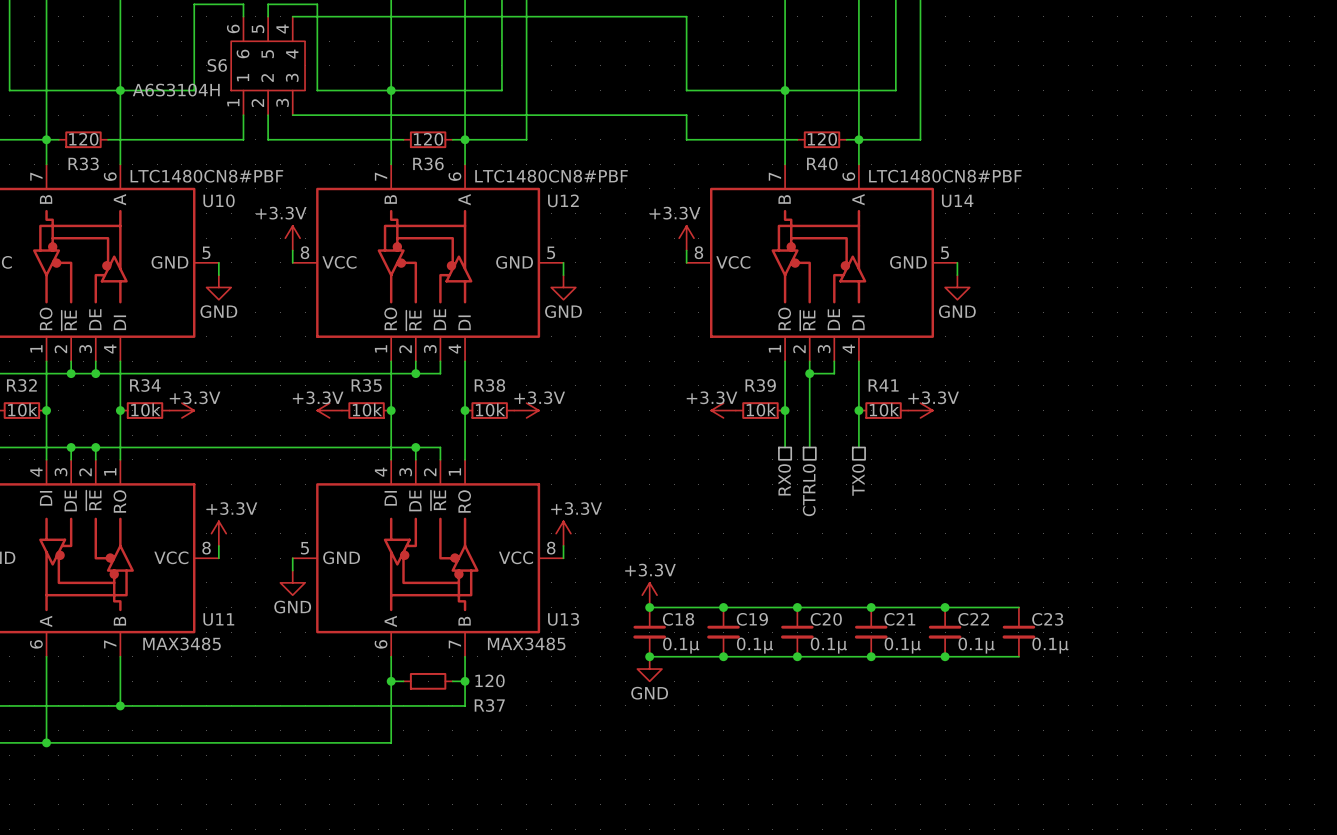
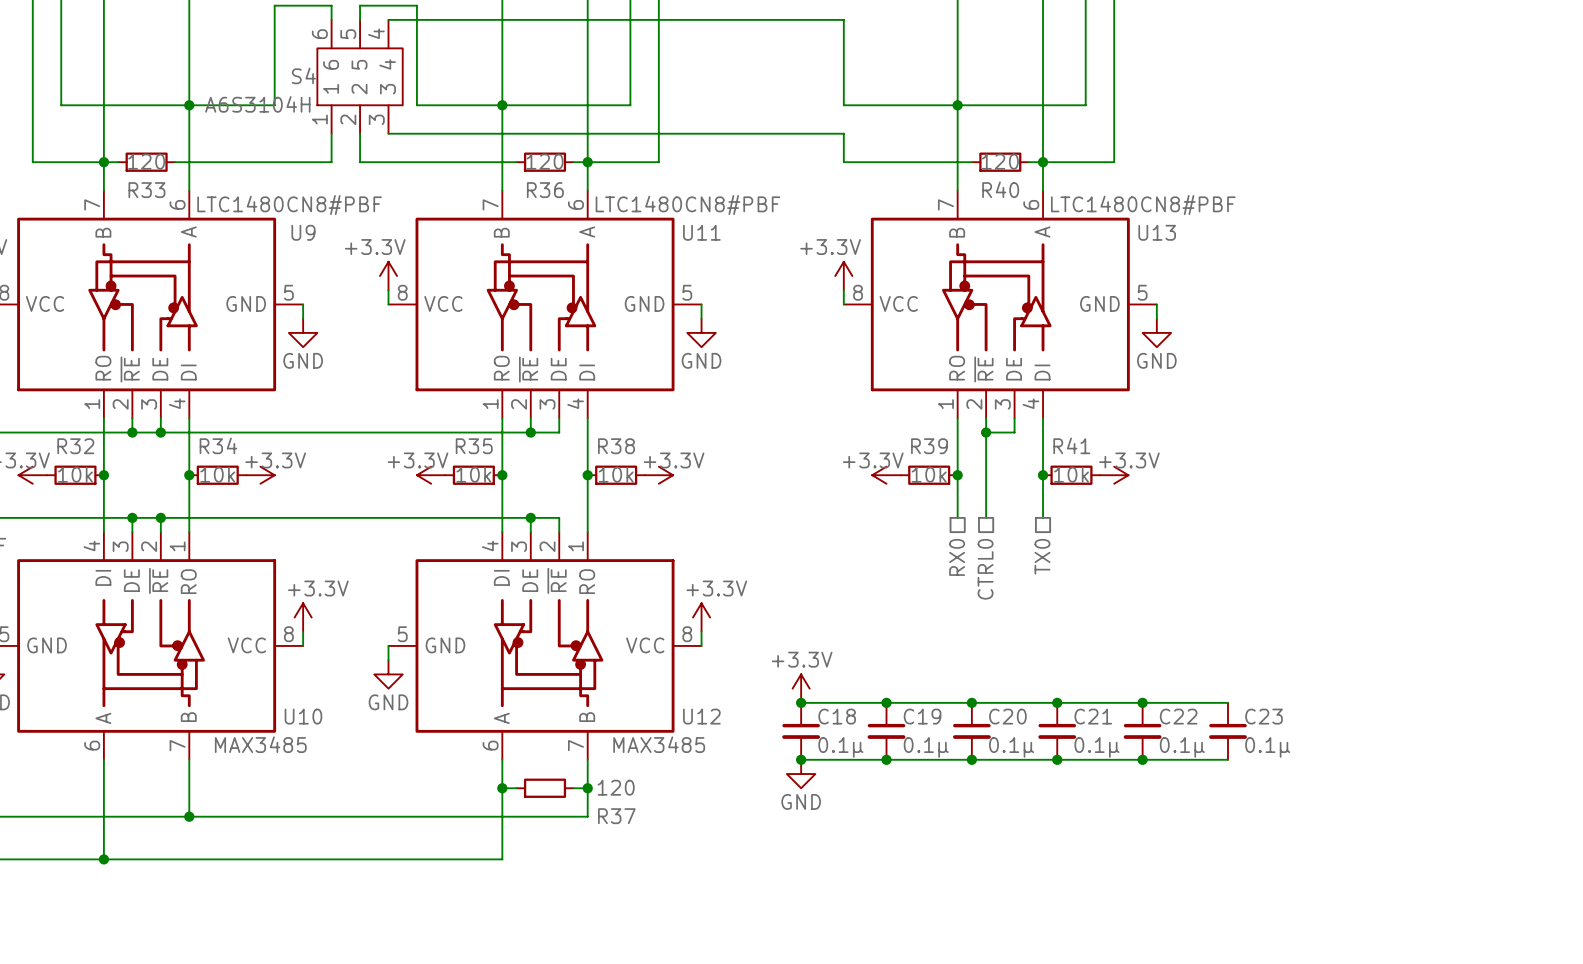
S6 name: S6 (217, 65) -> S4 (303, 75)
U10 name: U10 (219, 200) -> U9 (303, 232)
U12 name: U12 (563, 200) -> U11 (701, 232)
U14 name: U14 (957, 200) -> U13 (1157, 232)
U11 name: U11 (218, 619) -> U10 (303, 716)
U13 name: U13 (563, 619) -> U12 (701, 716)

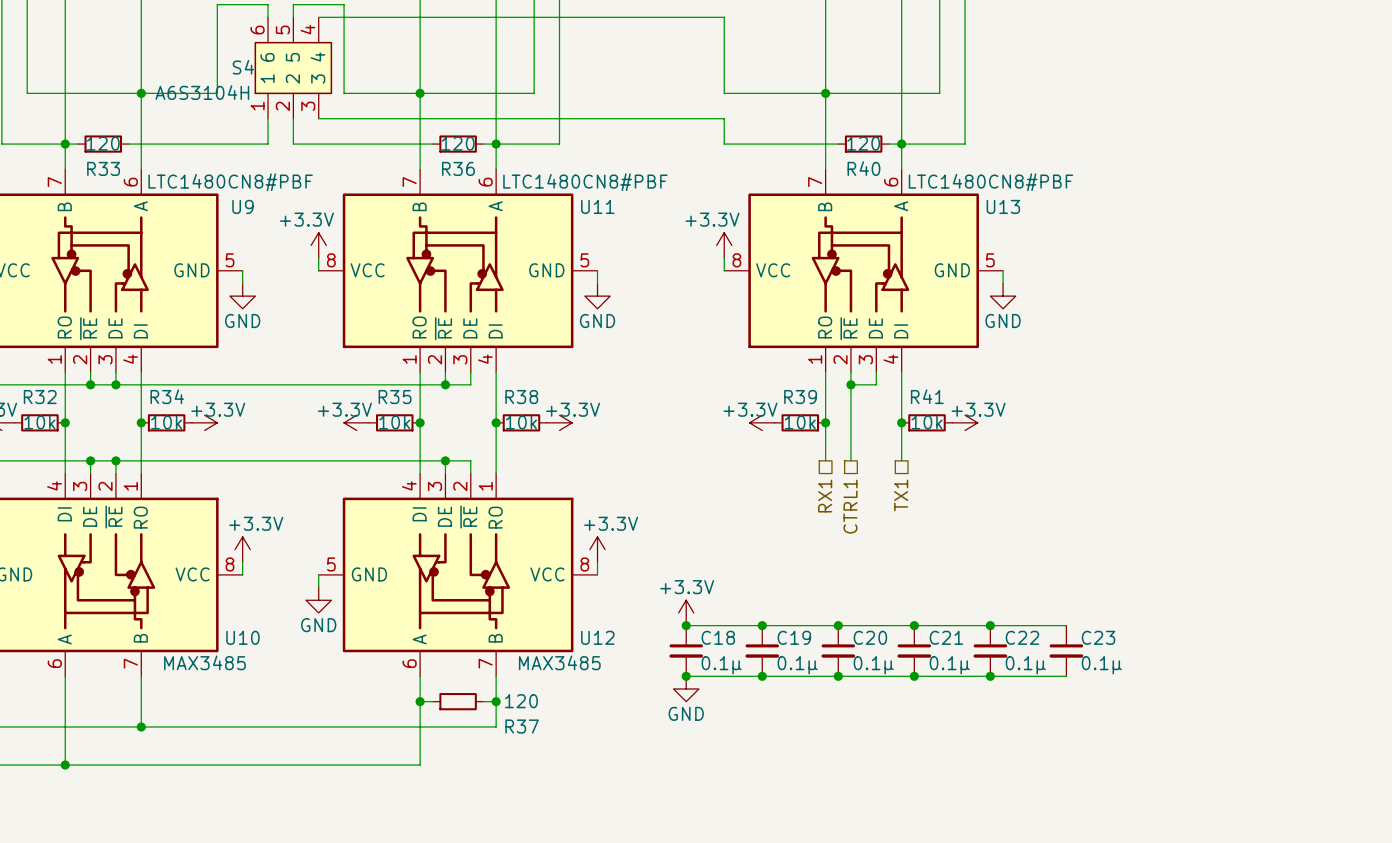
hierarchical label: TX0 (1042, 556) -> TX1 (901, 495)
hierarchical label: RX0 (957, 557) -> RX1 (825, 496)
hierarchical label: CTRL0 (985, 569) -> CTRL1 (850, 506)

